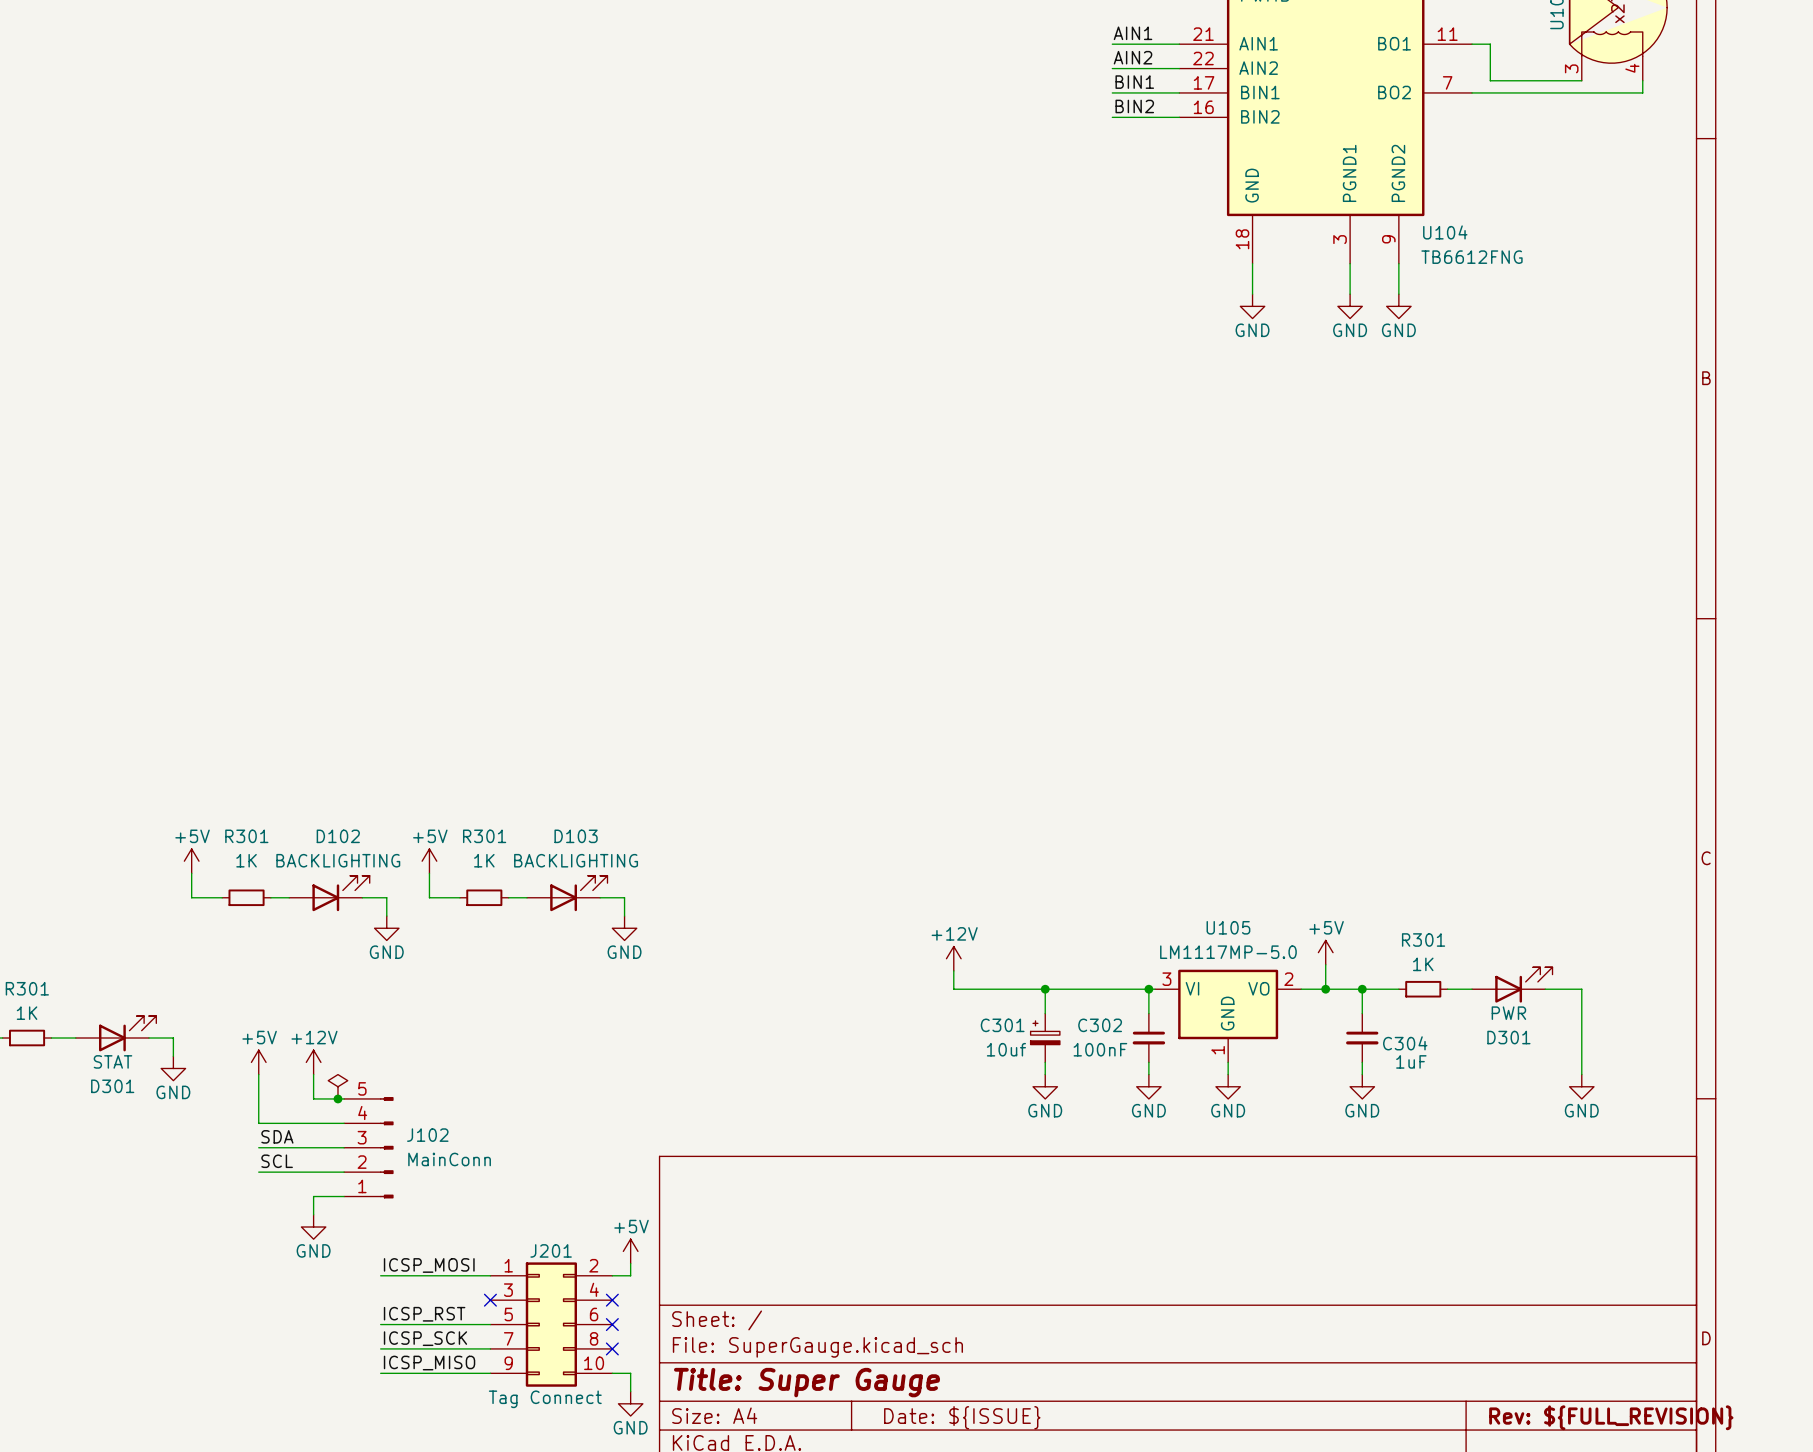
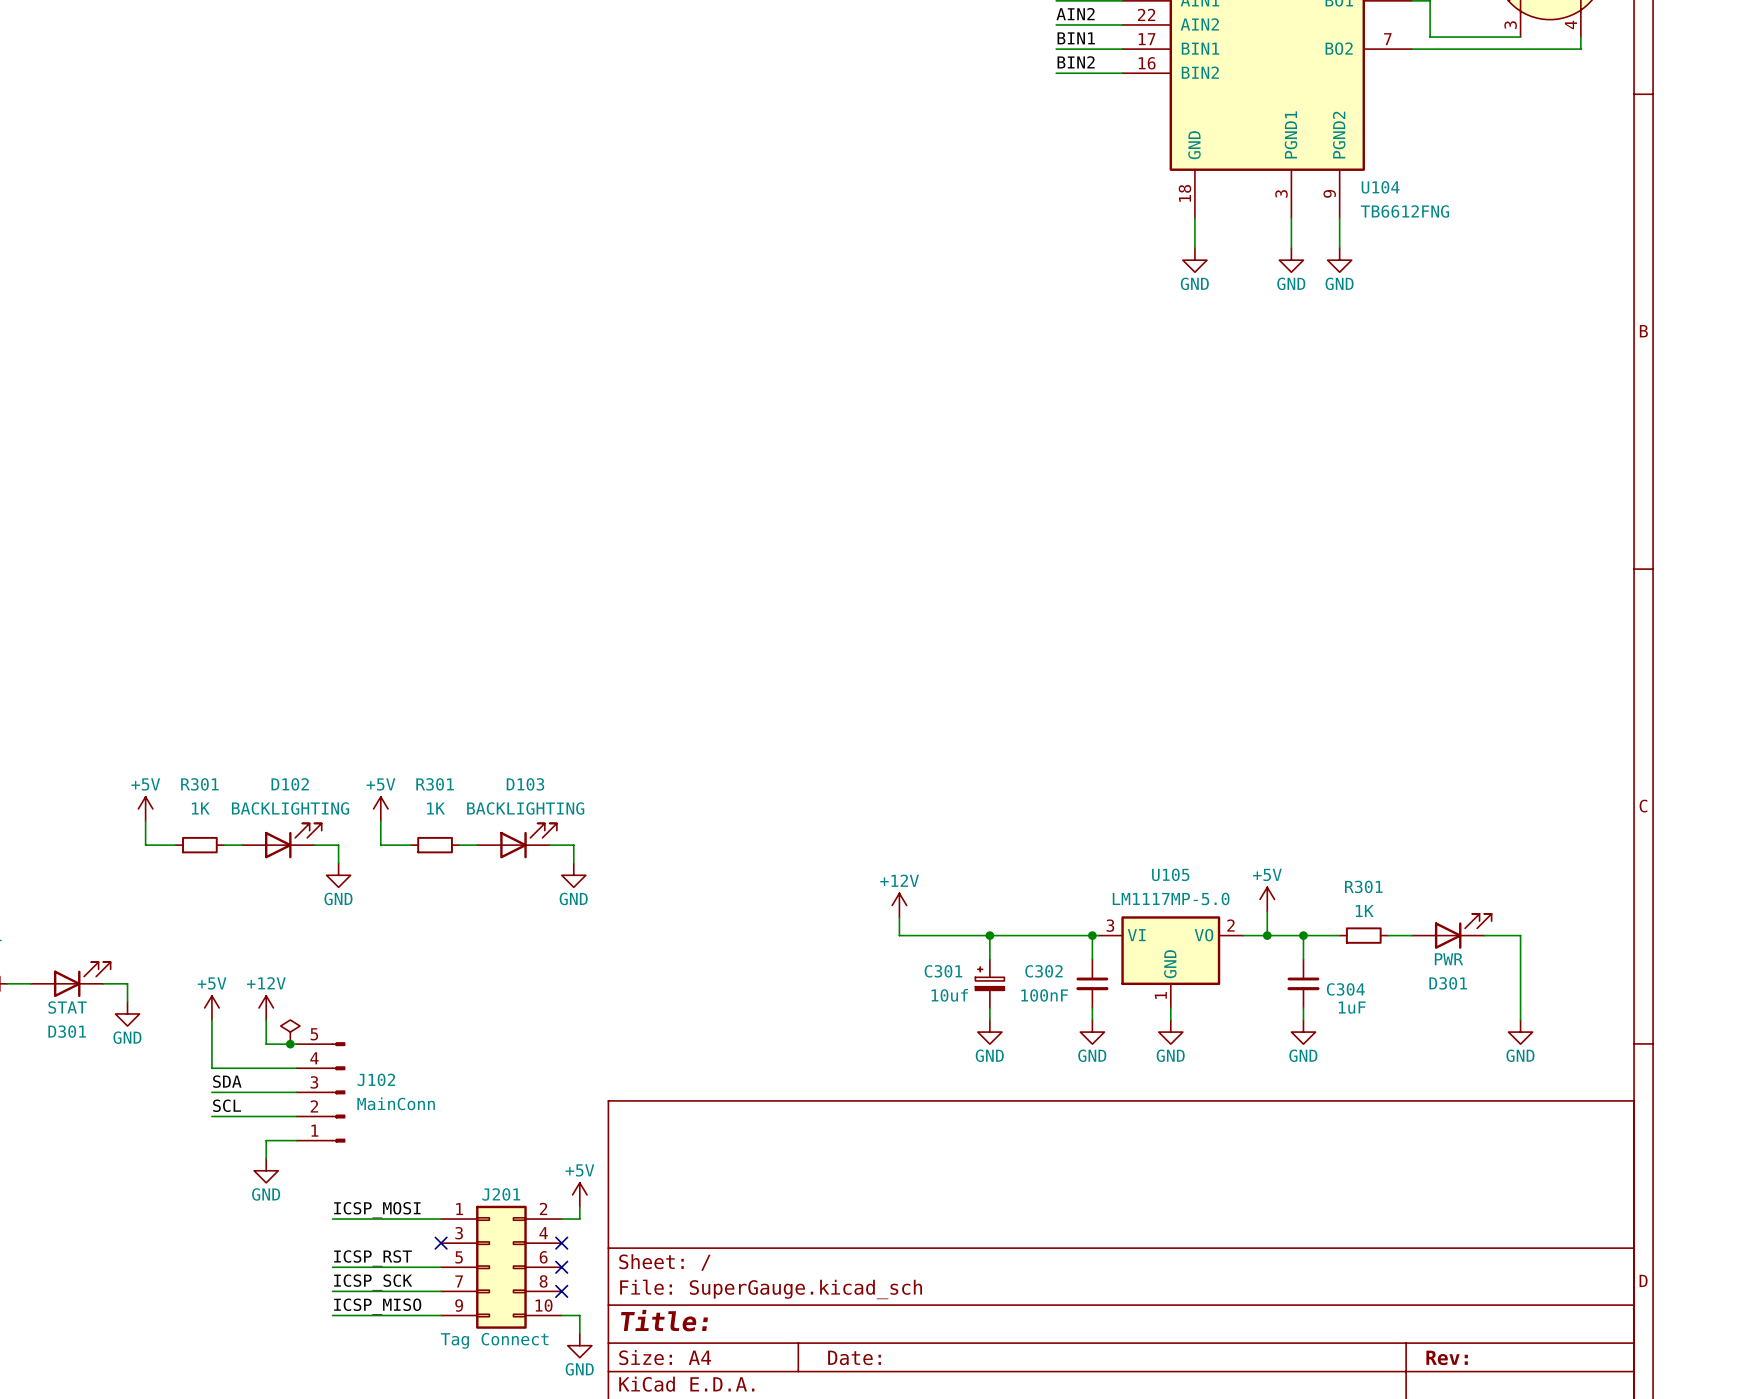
title block: Title: Super Gauge (807, 1382) -> Title: (664, 1320)
title block: Date: ${ISSUE} (962, 1417) -> Date: (854, 1357)
title block: Rev: ${FULL_REVISION} (1611, 1417) -> Rev: (1447, 1357)

